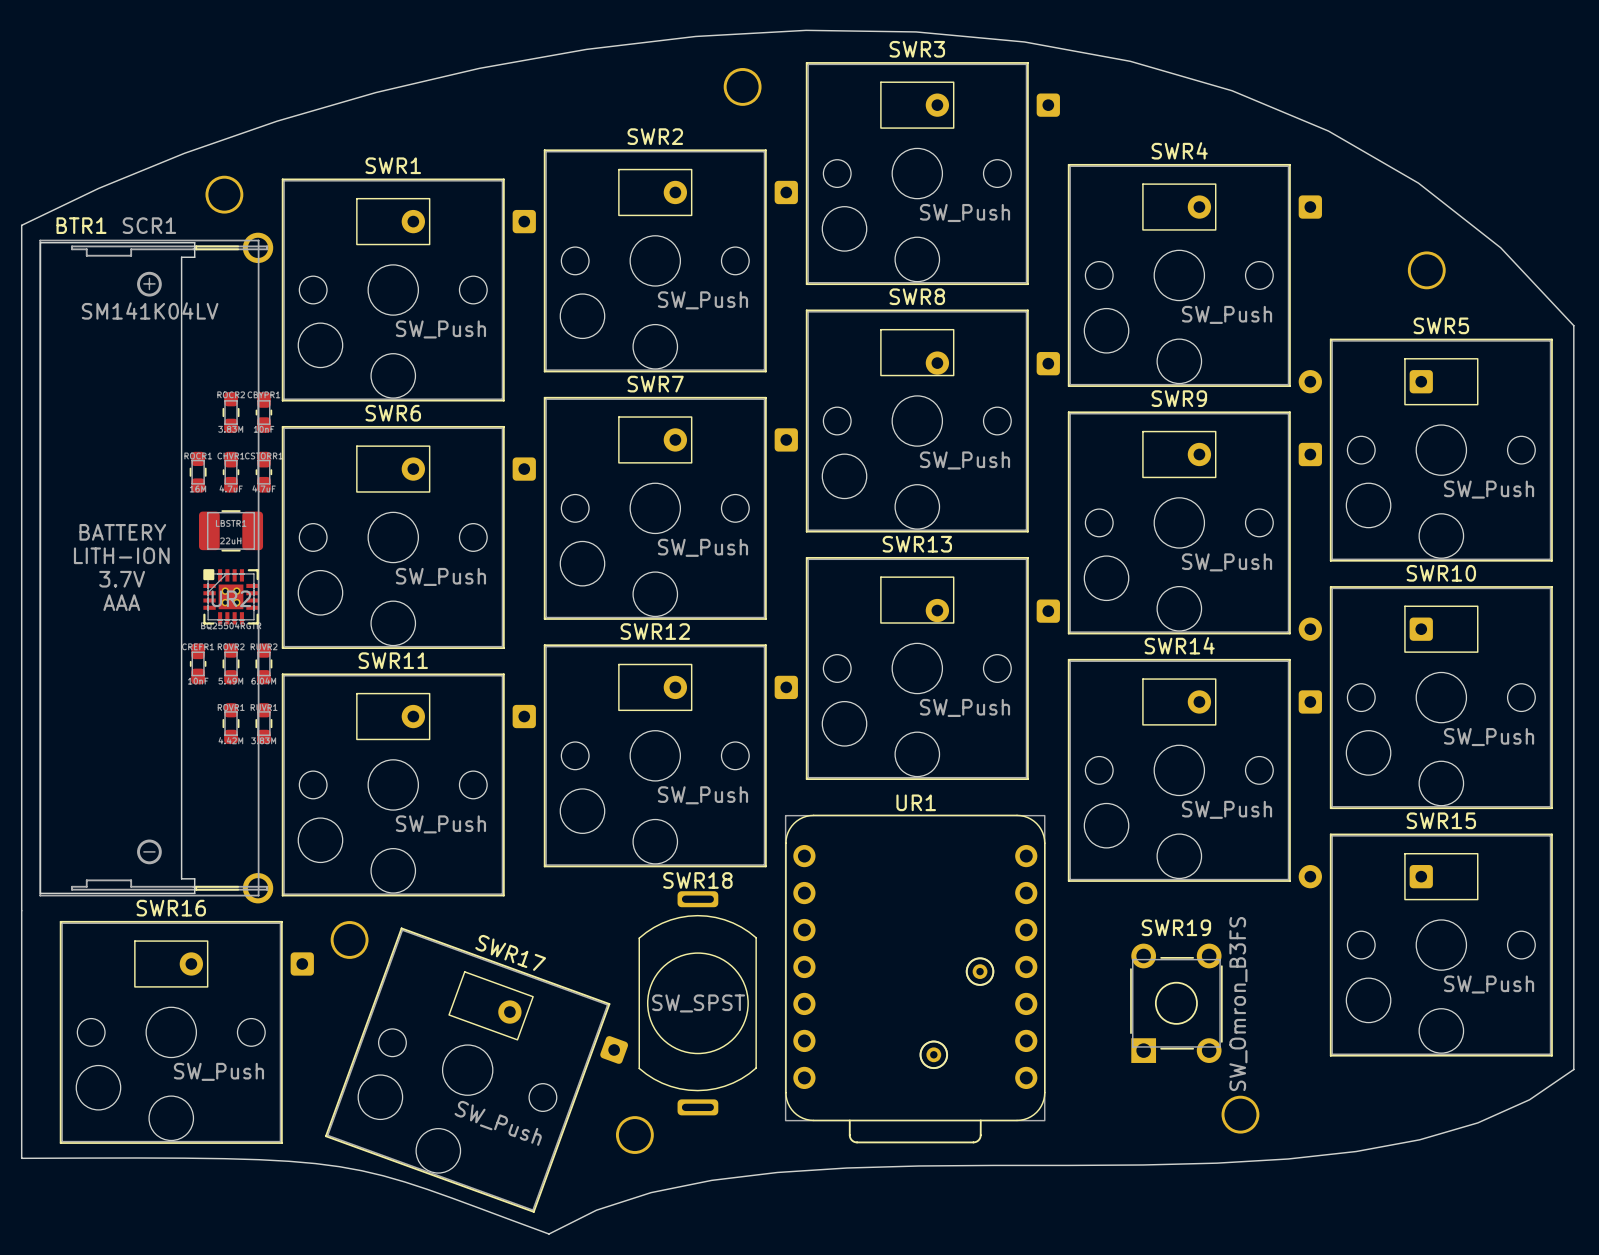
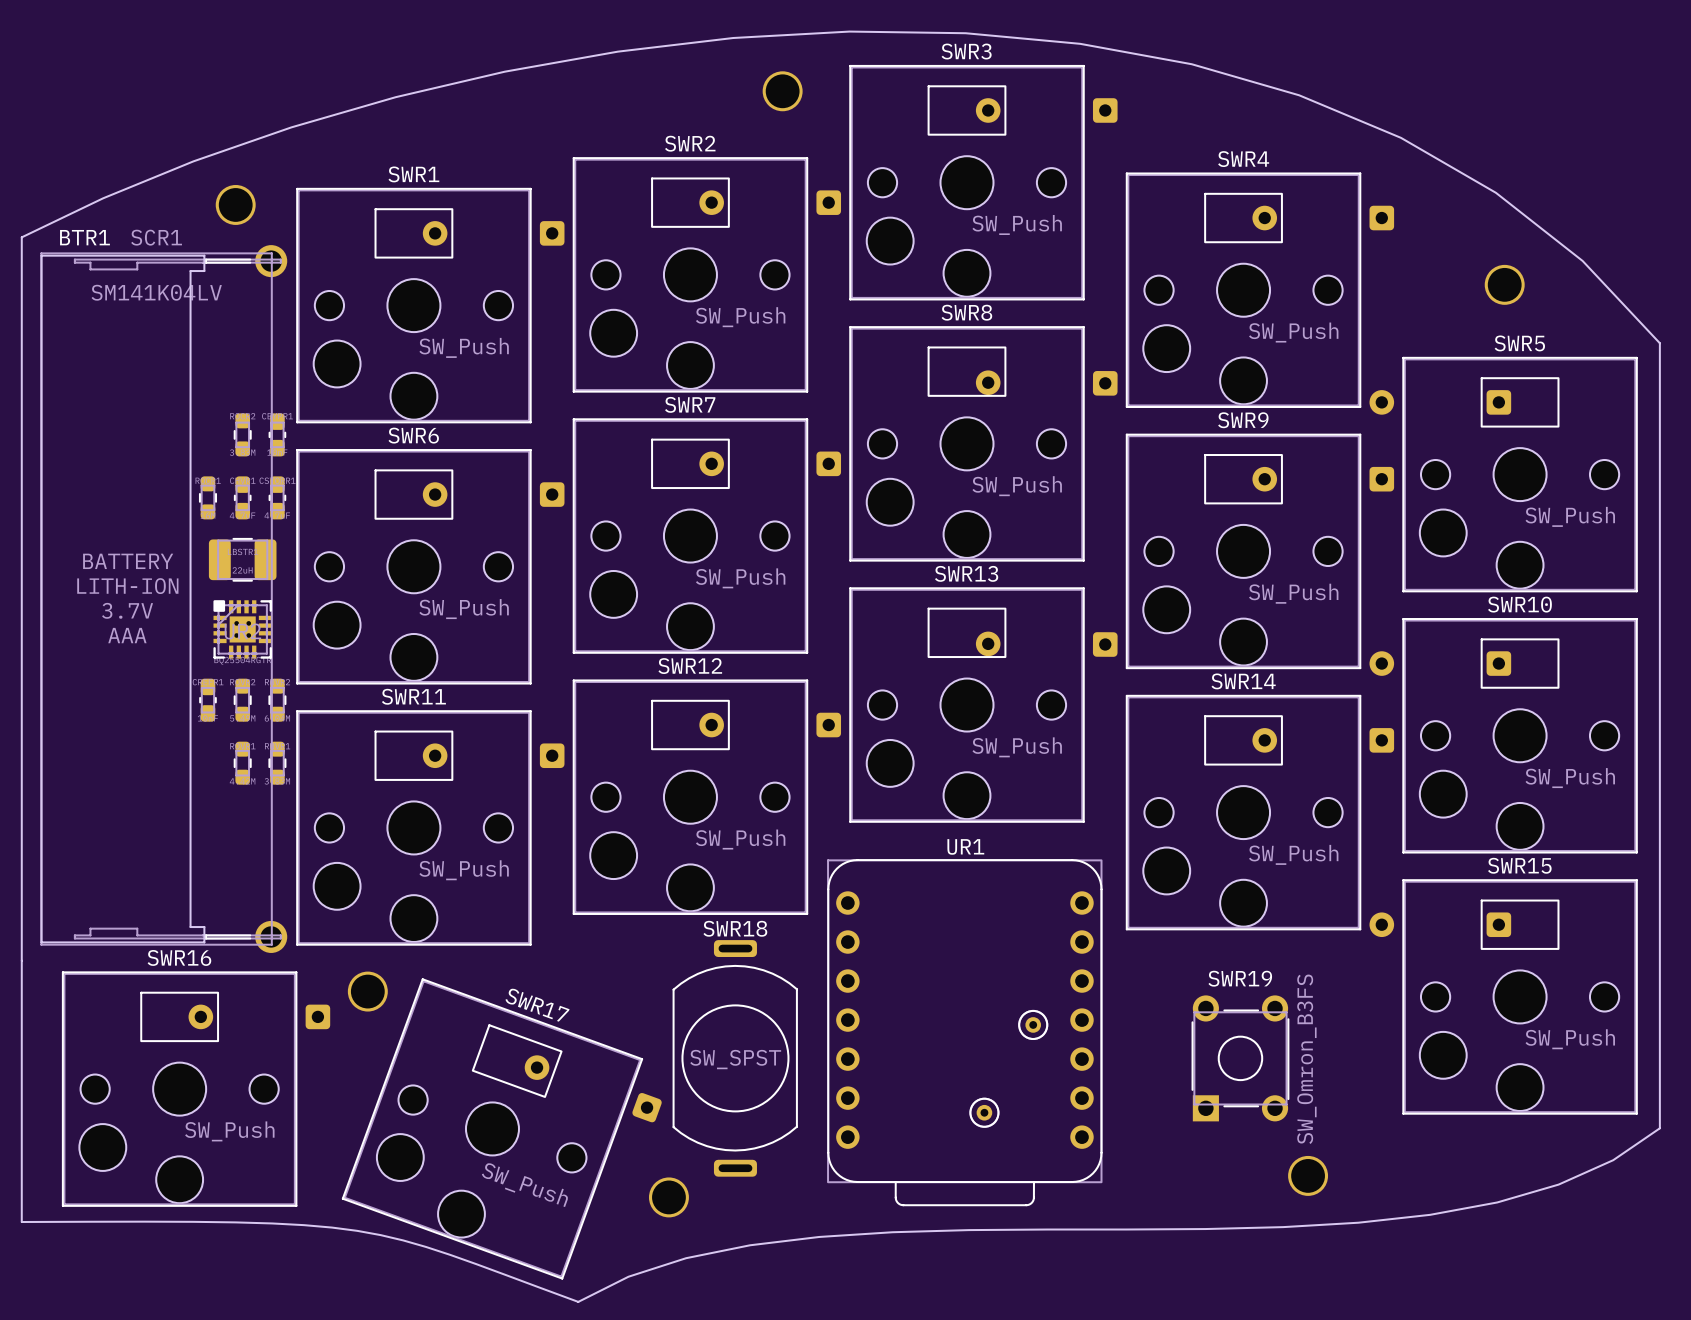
SCR1 footprint: [39, 239, 260, 897] -> [40, 252, 273, 946]
SCR1 value position: SM141K04LV (150, 310) -> SM141K04LV (156, 292)

